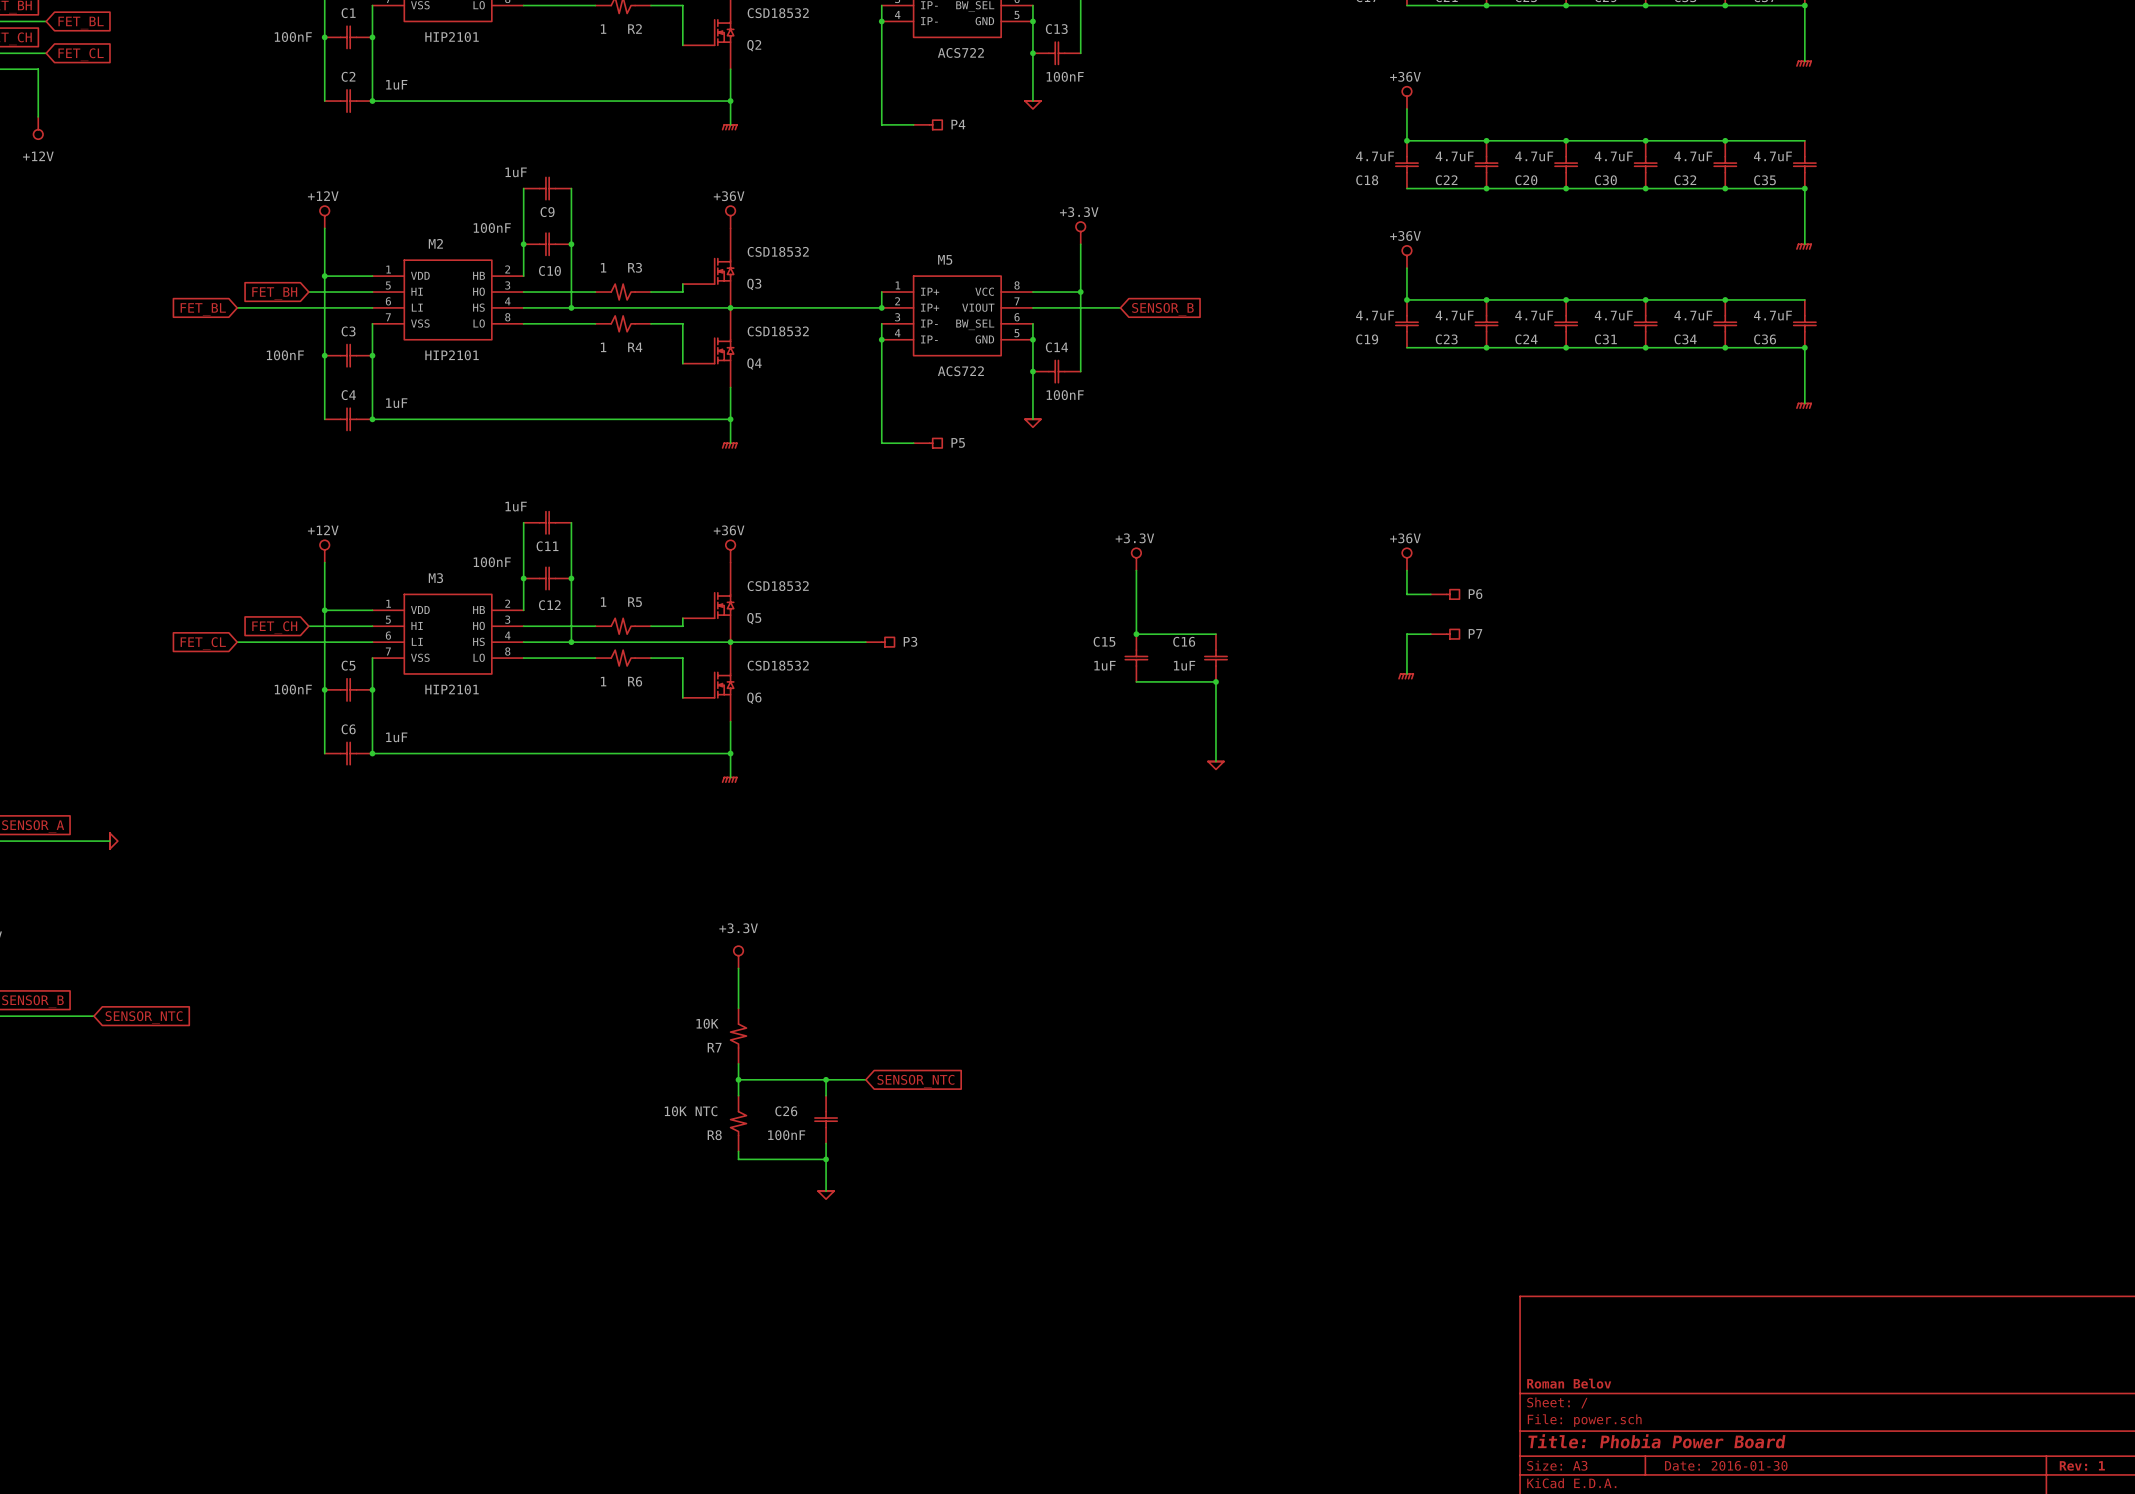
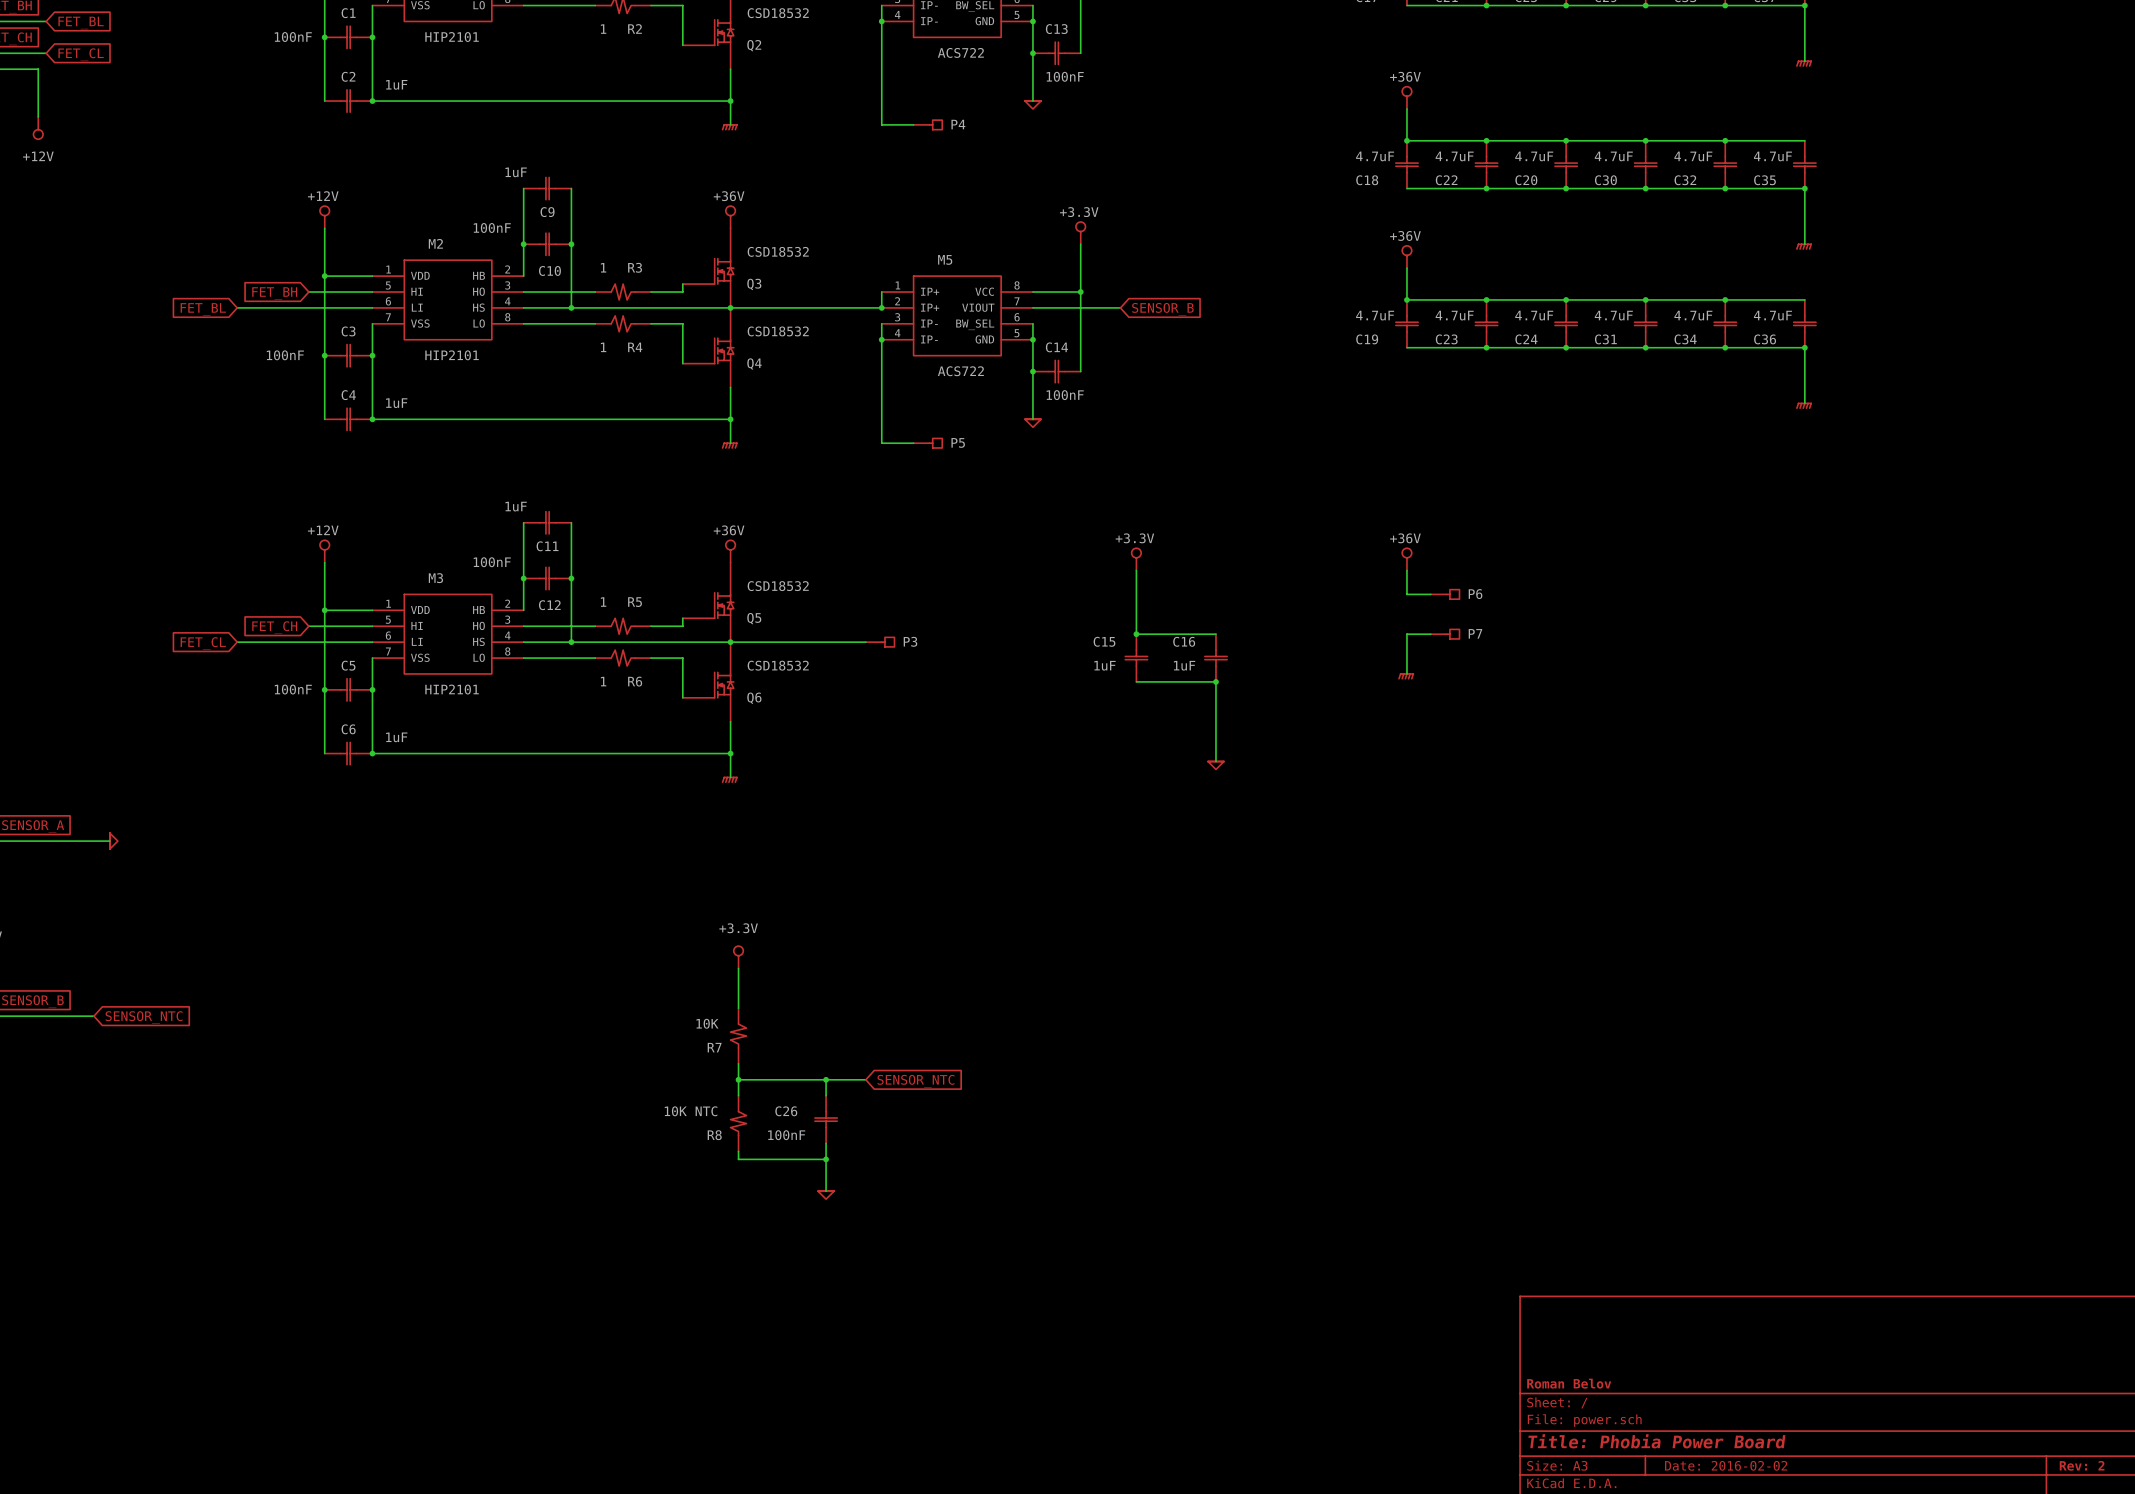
title block: Date: 2016-01-30 (1726, 1465) -> Date: 2016-02-02 (1726, 1465)
title block: Rev: 1 (2082, 1465) -> Rev: 2 (2082, 1465)

